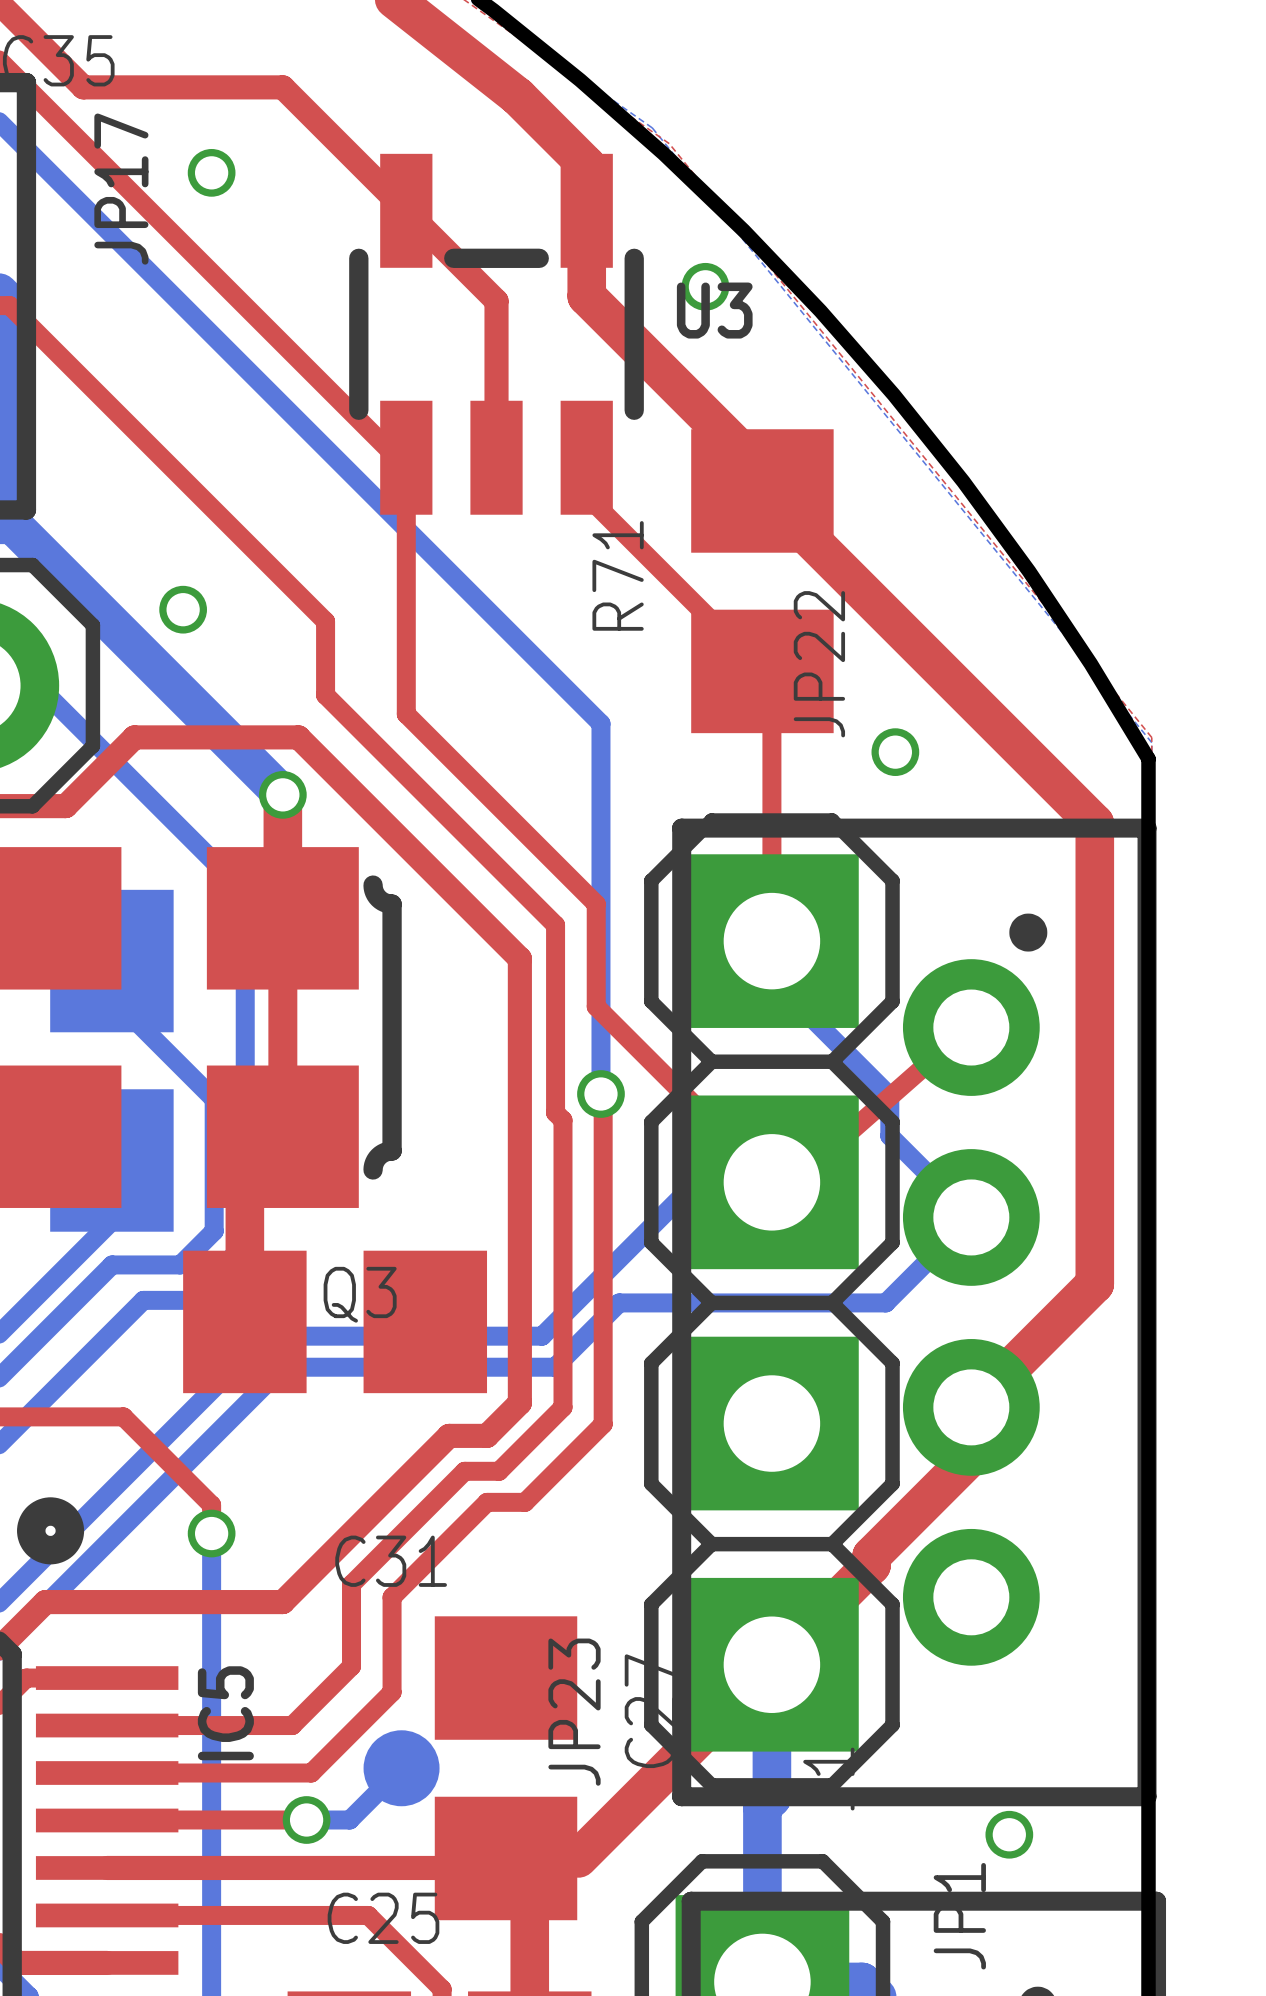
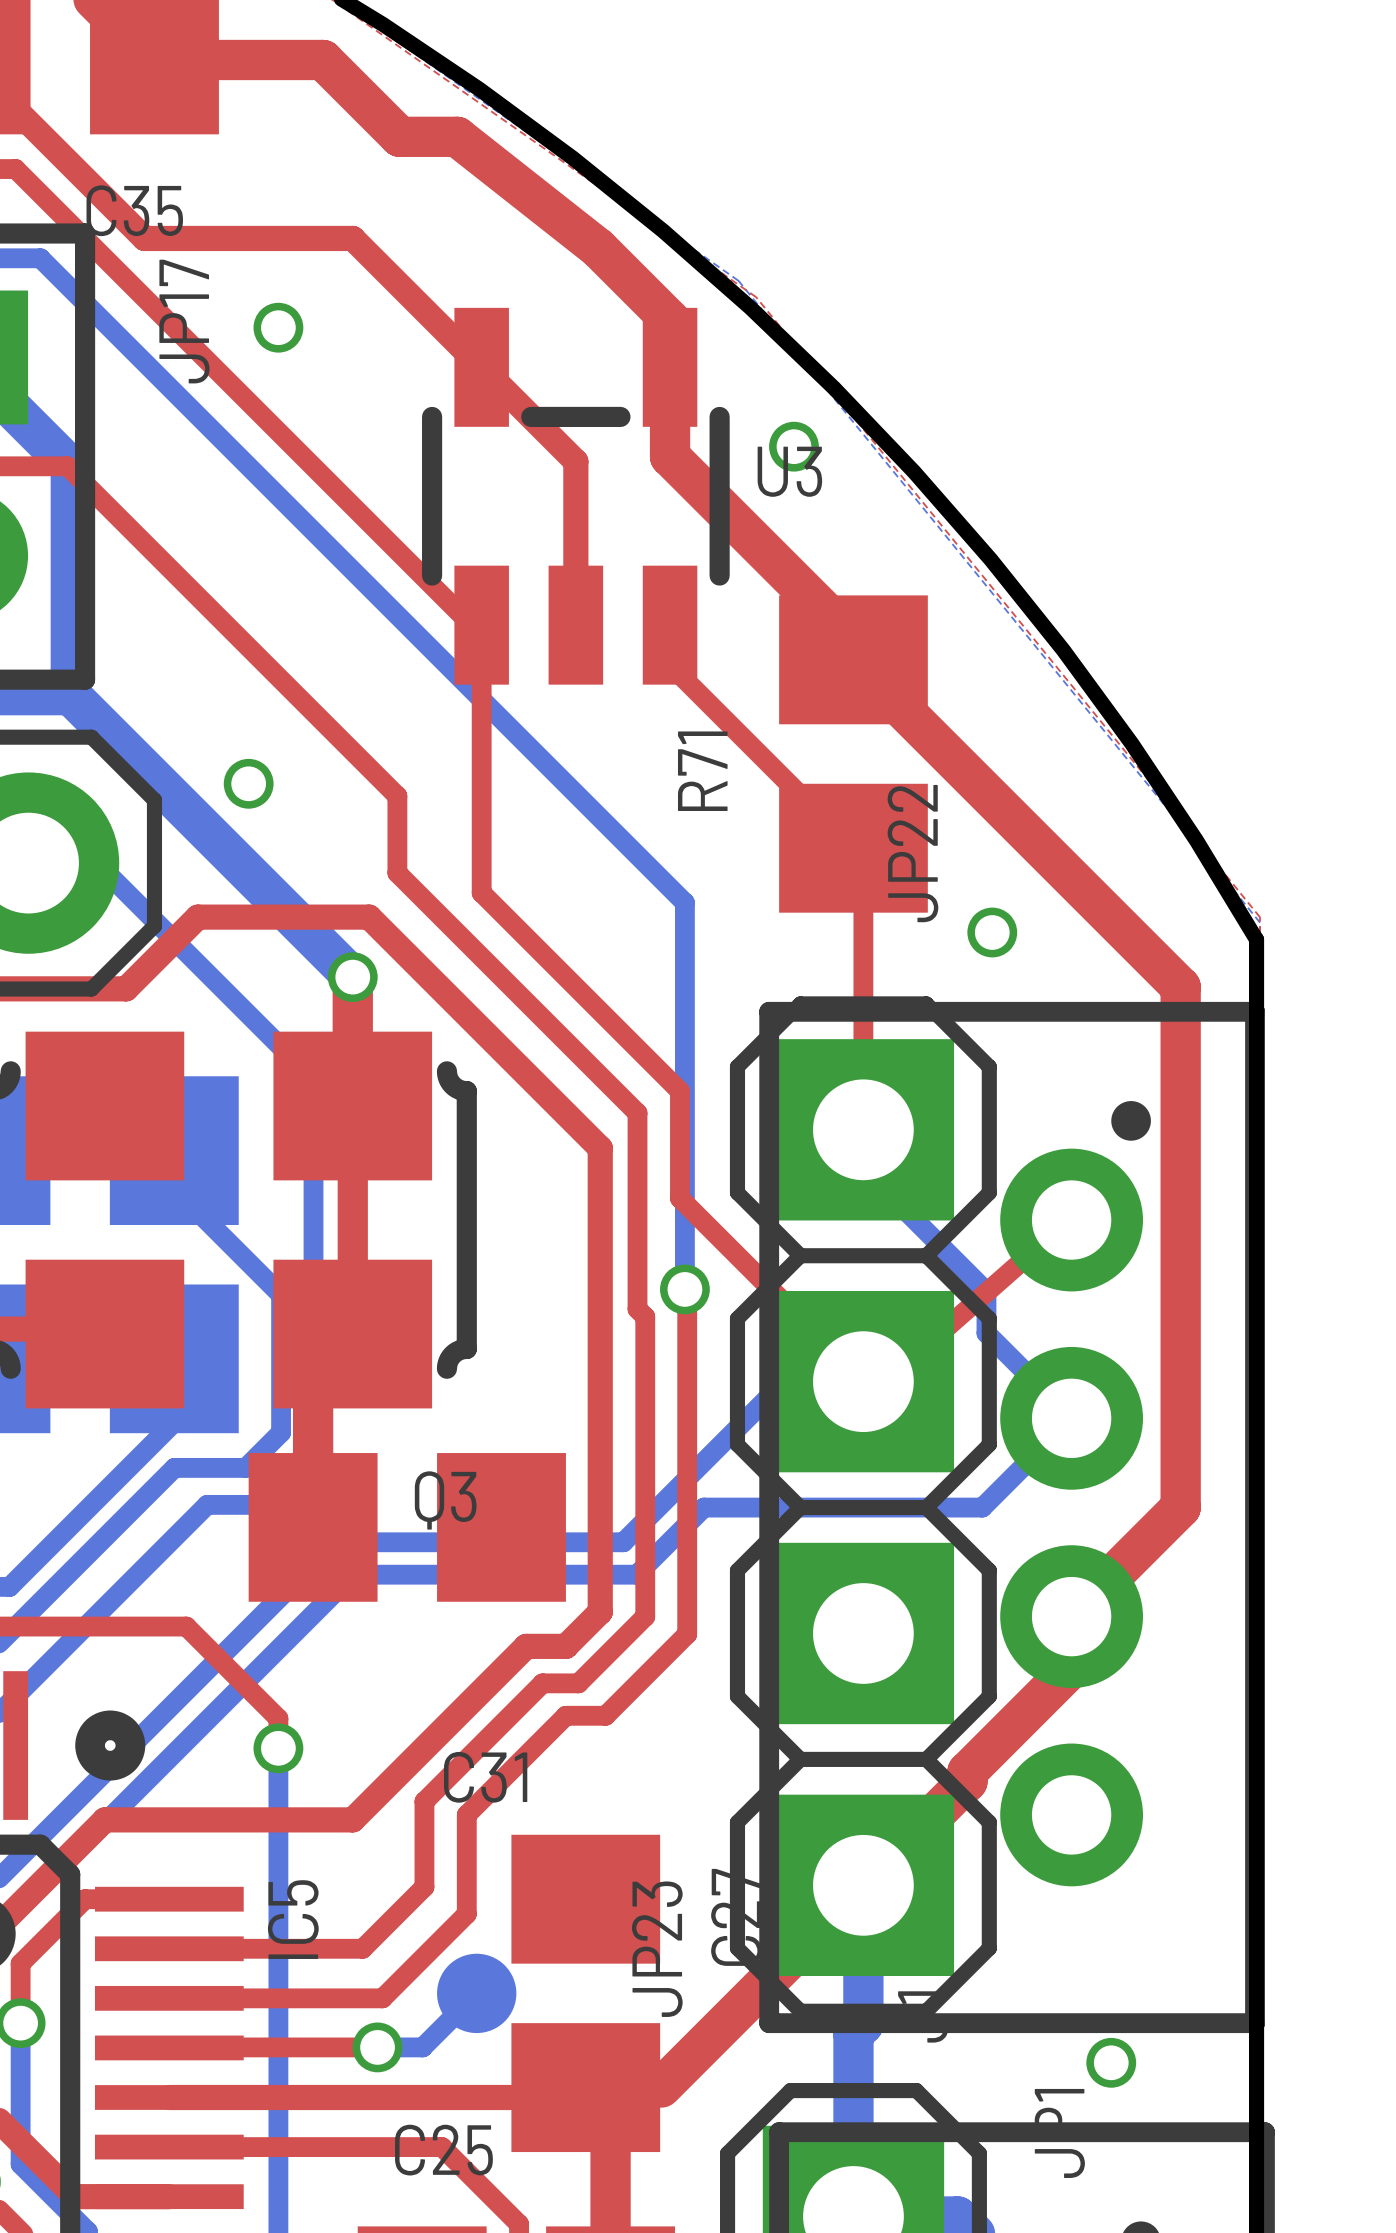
top track: (1075, 804) (1094, 823) (1094, 1283) (1075, 1302) -> (1180, 987) (1180, 1507)

